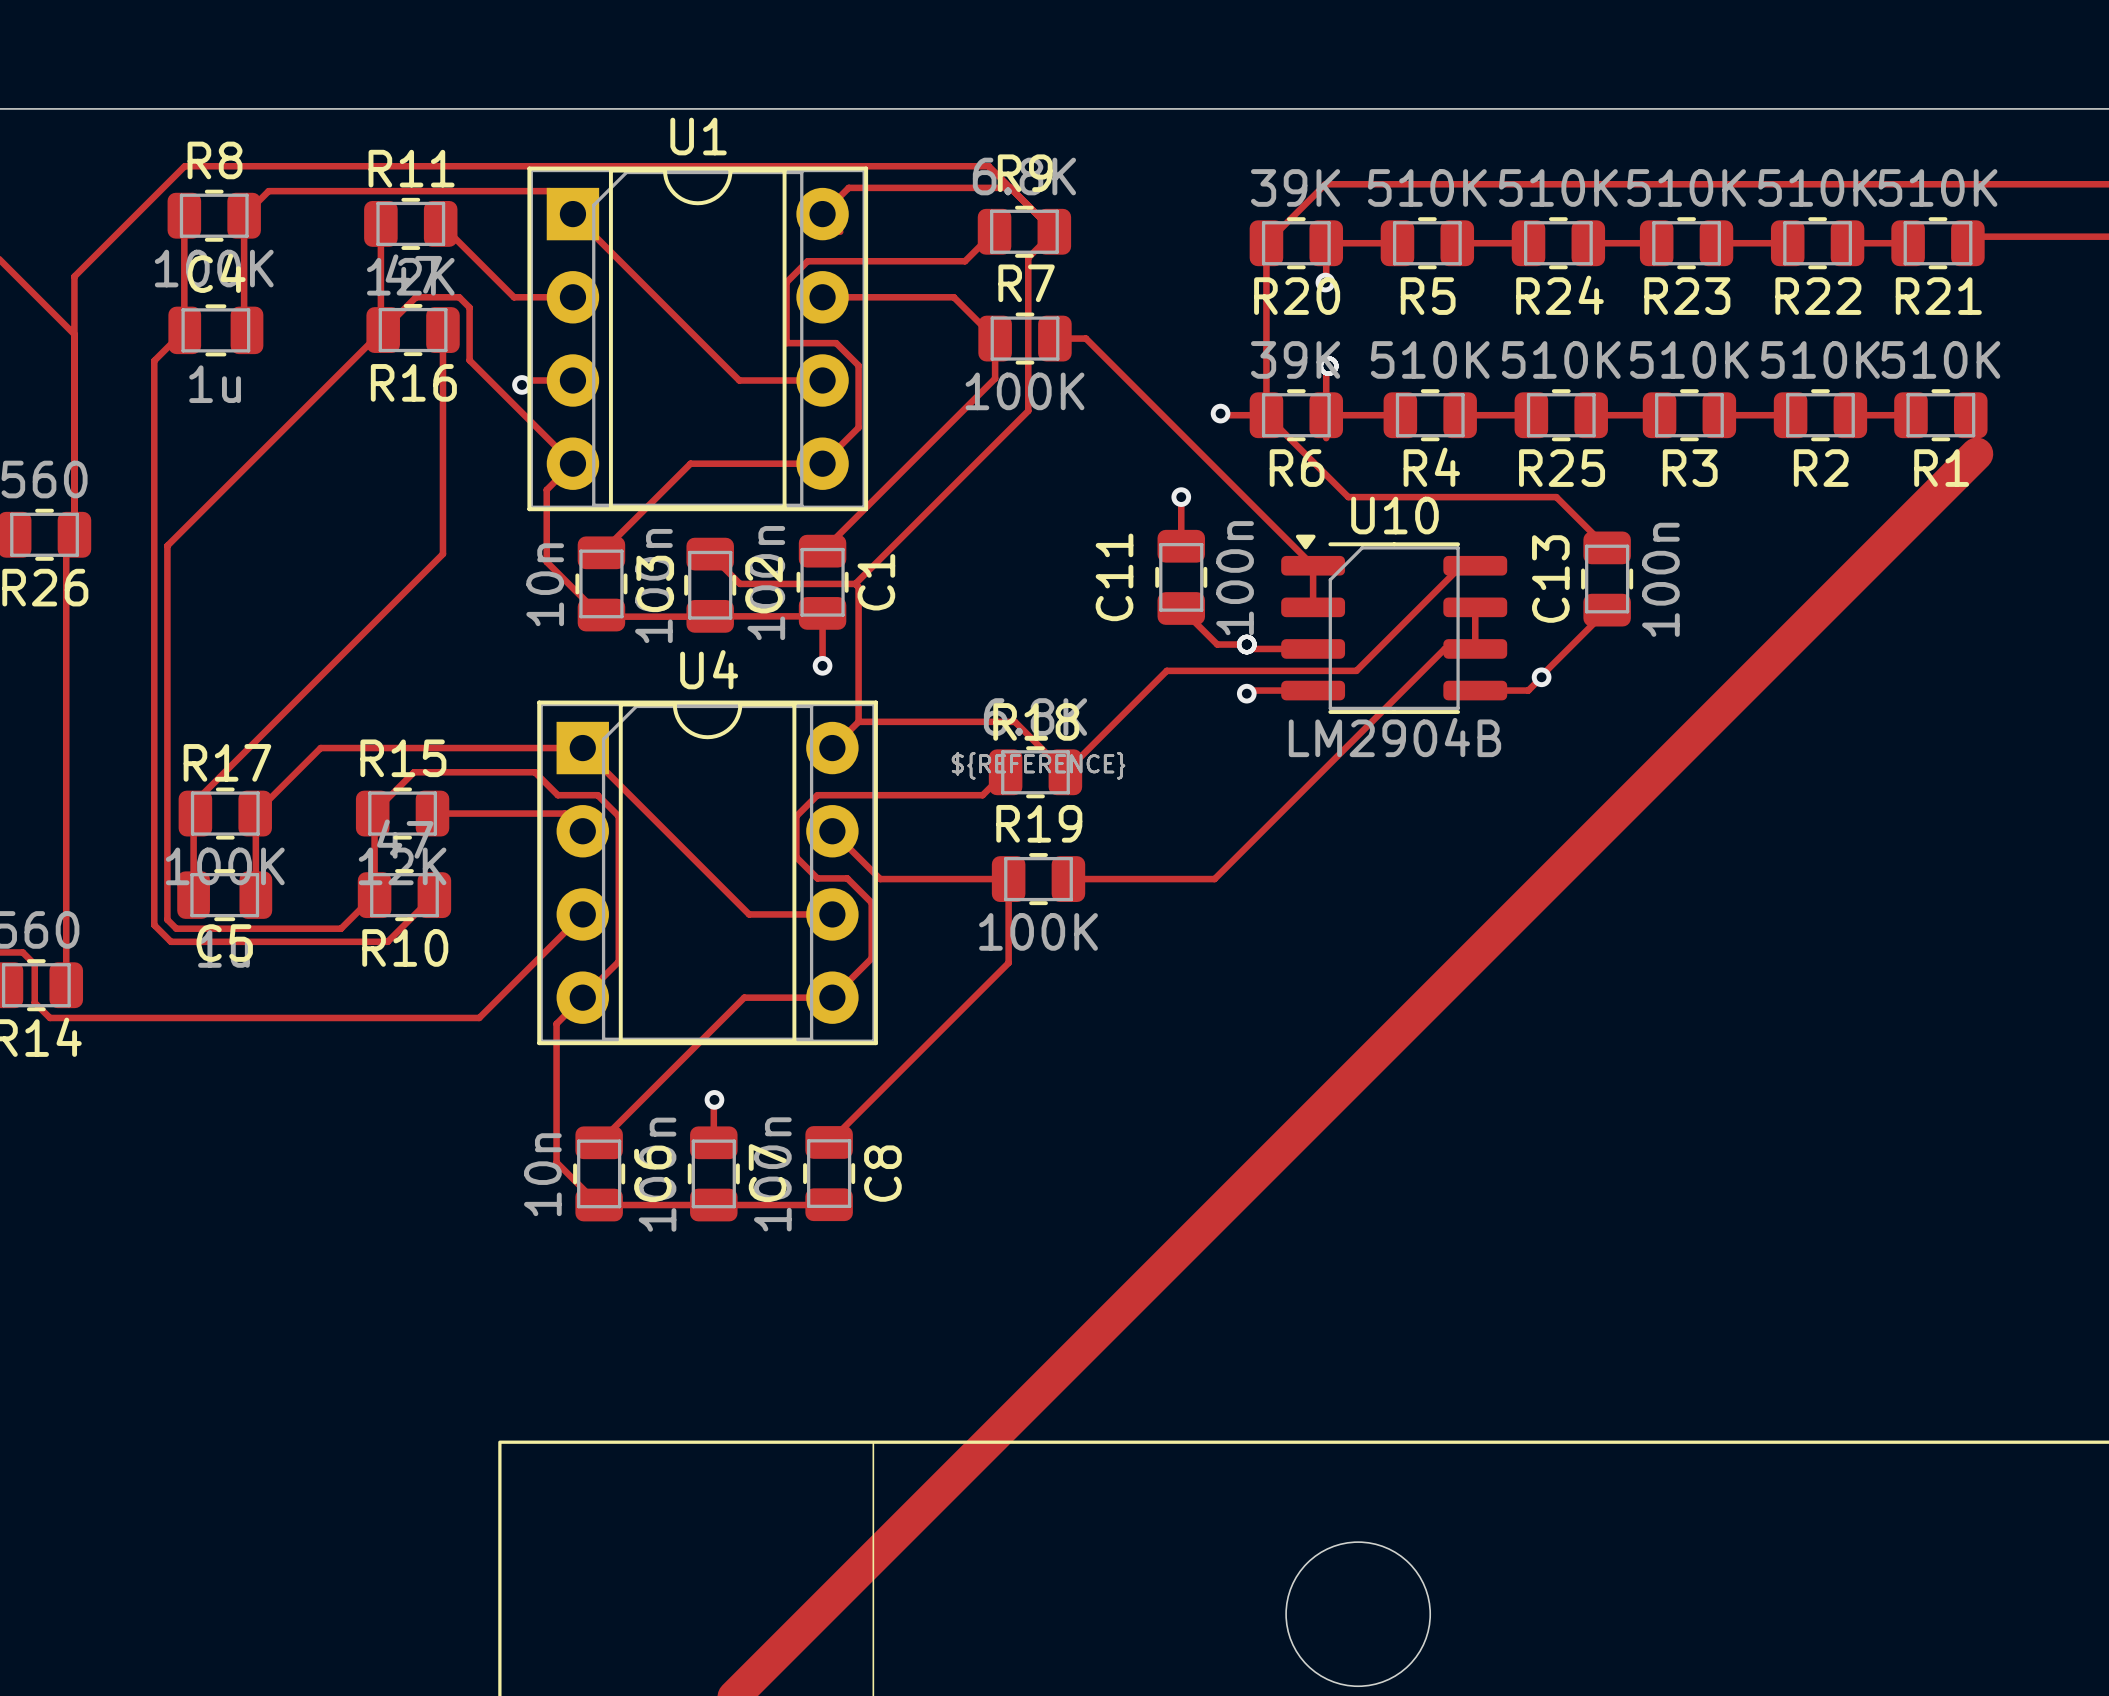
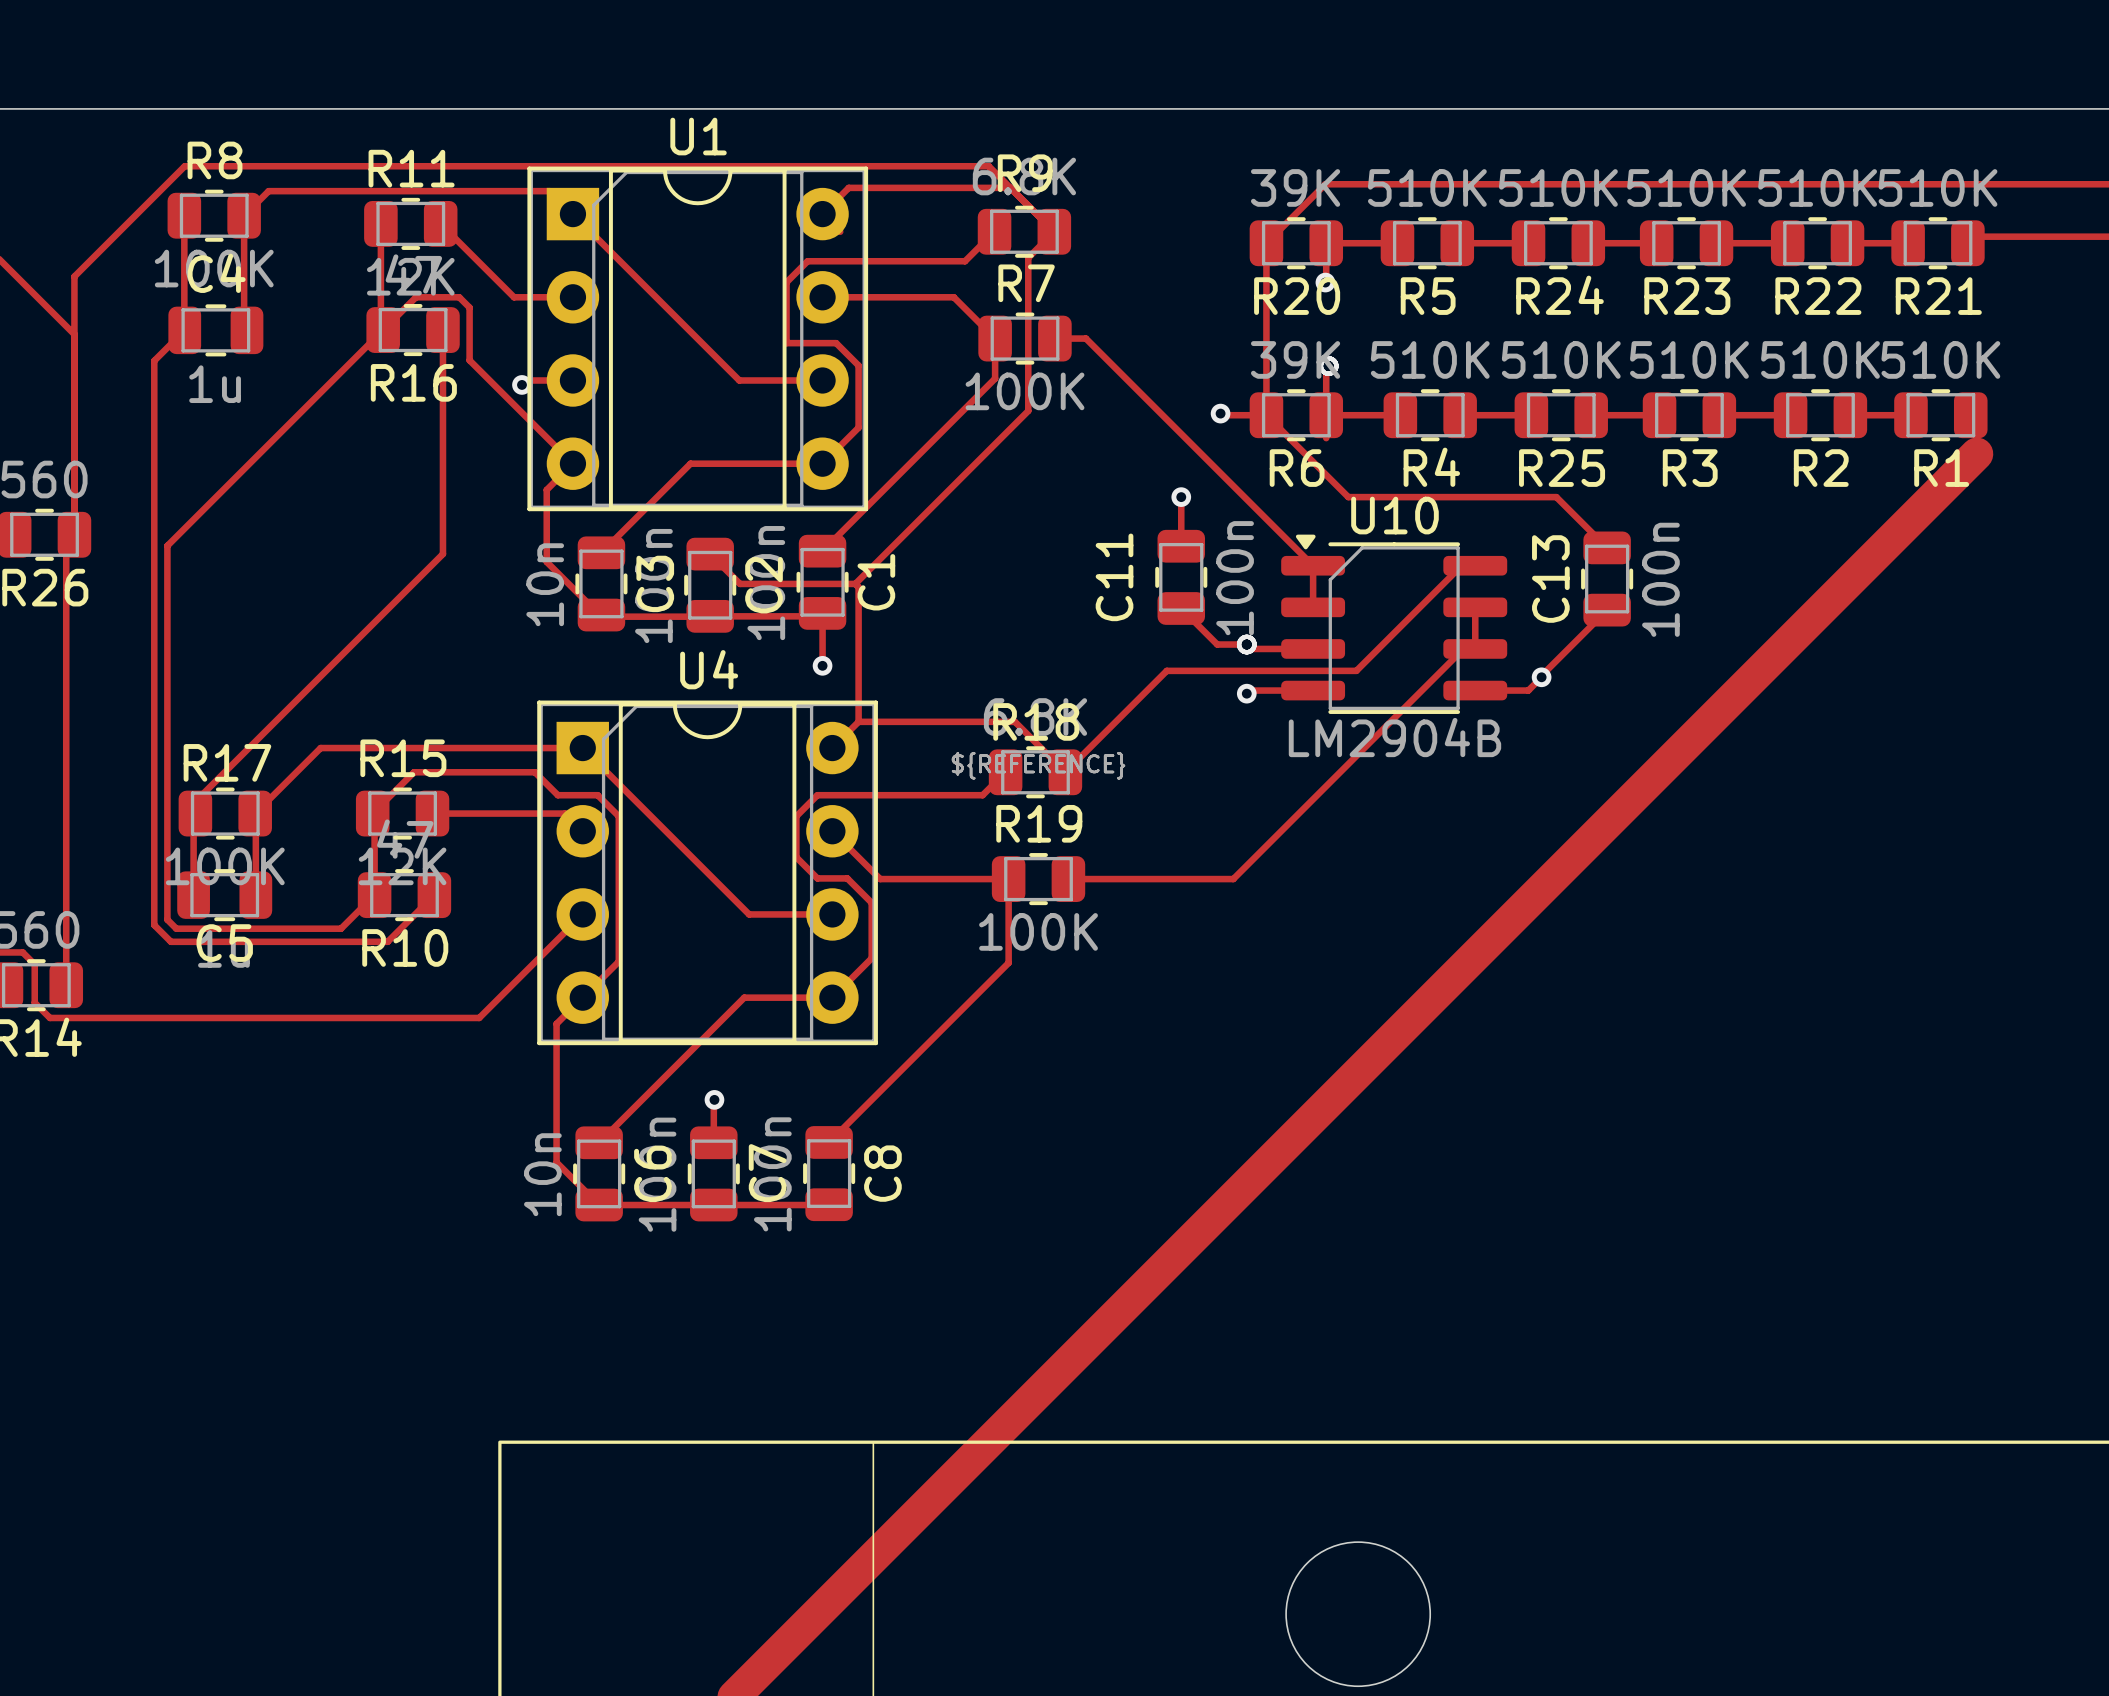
track: (1463, 648) (1444, 648) (1214, 879) -> (1463, 648) (1233, 879) (1214, 879)

